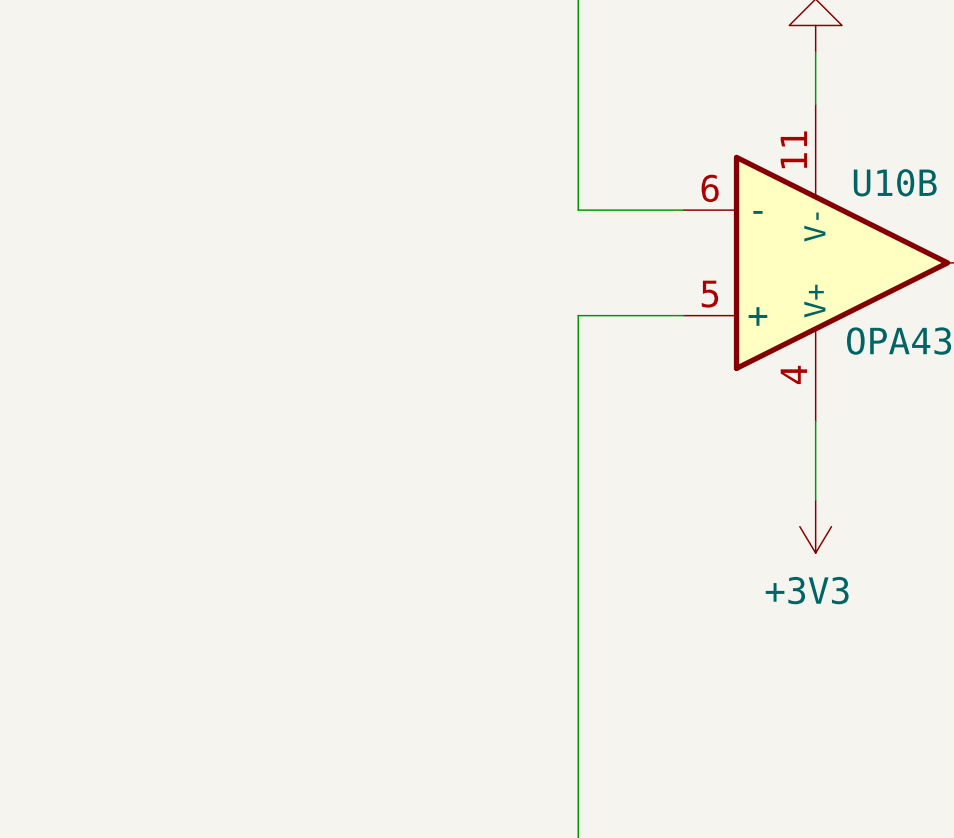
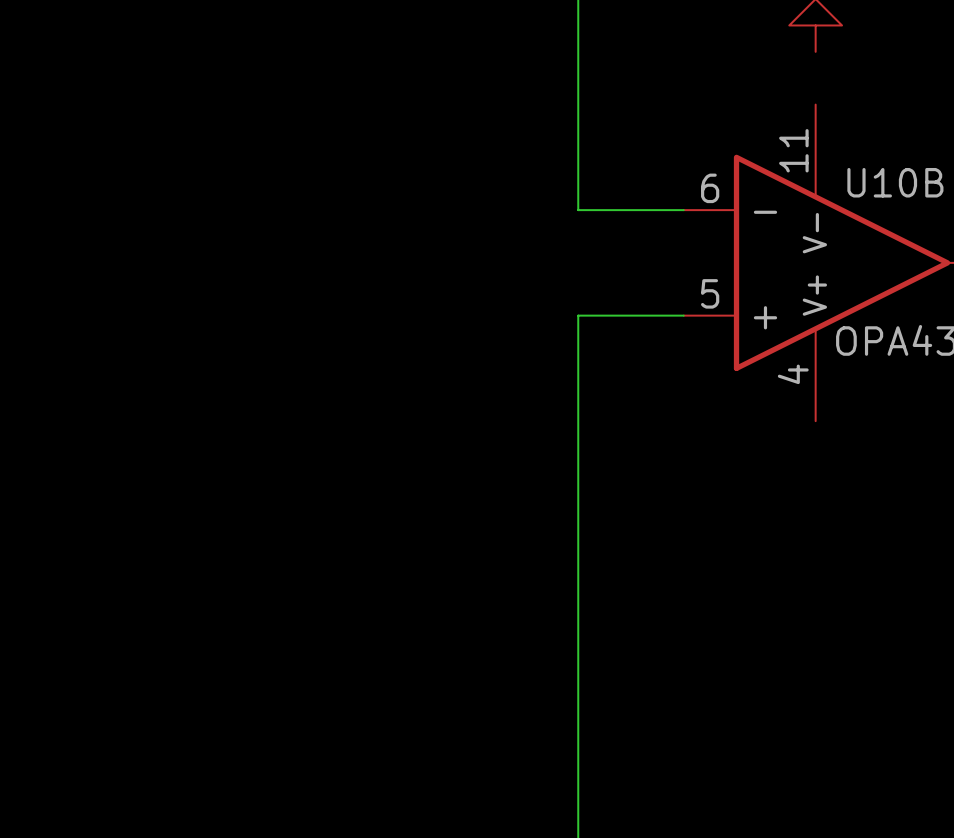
wire: (815, 51) (815, 104) -> none
wire: (815, 421) (815, 500) -> none
power symbol: +3V3 (815, 526) -> none

